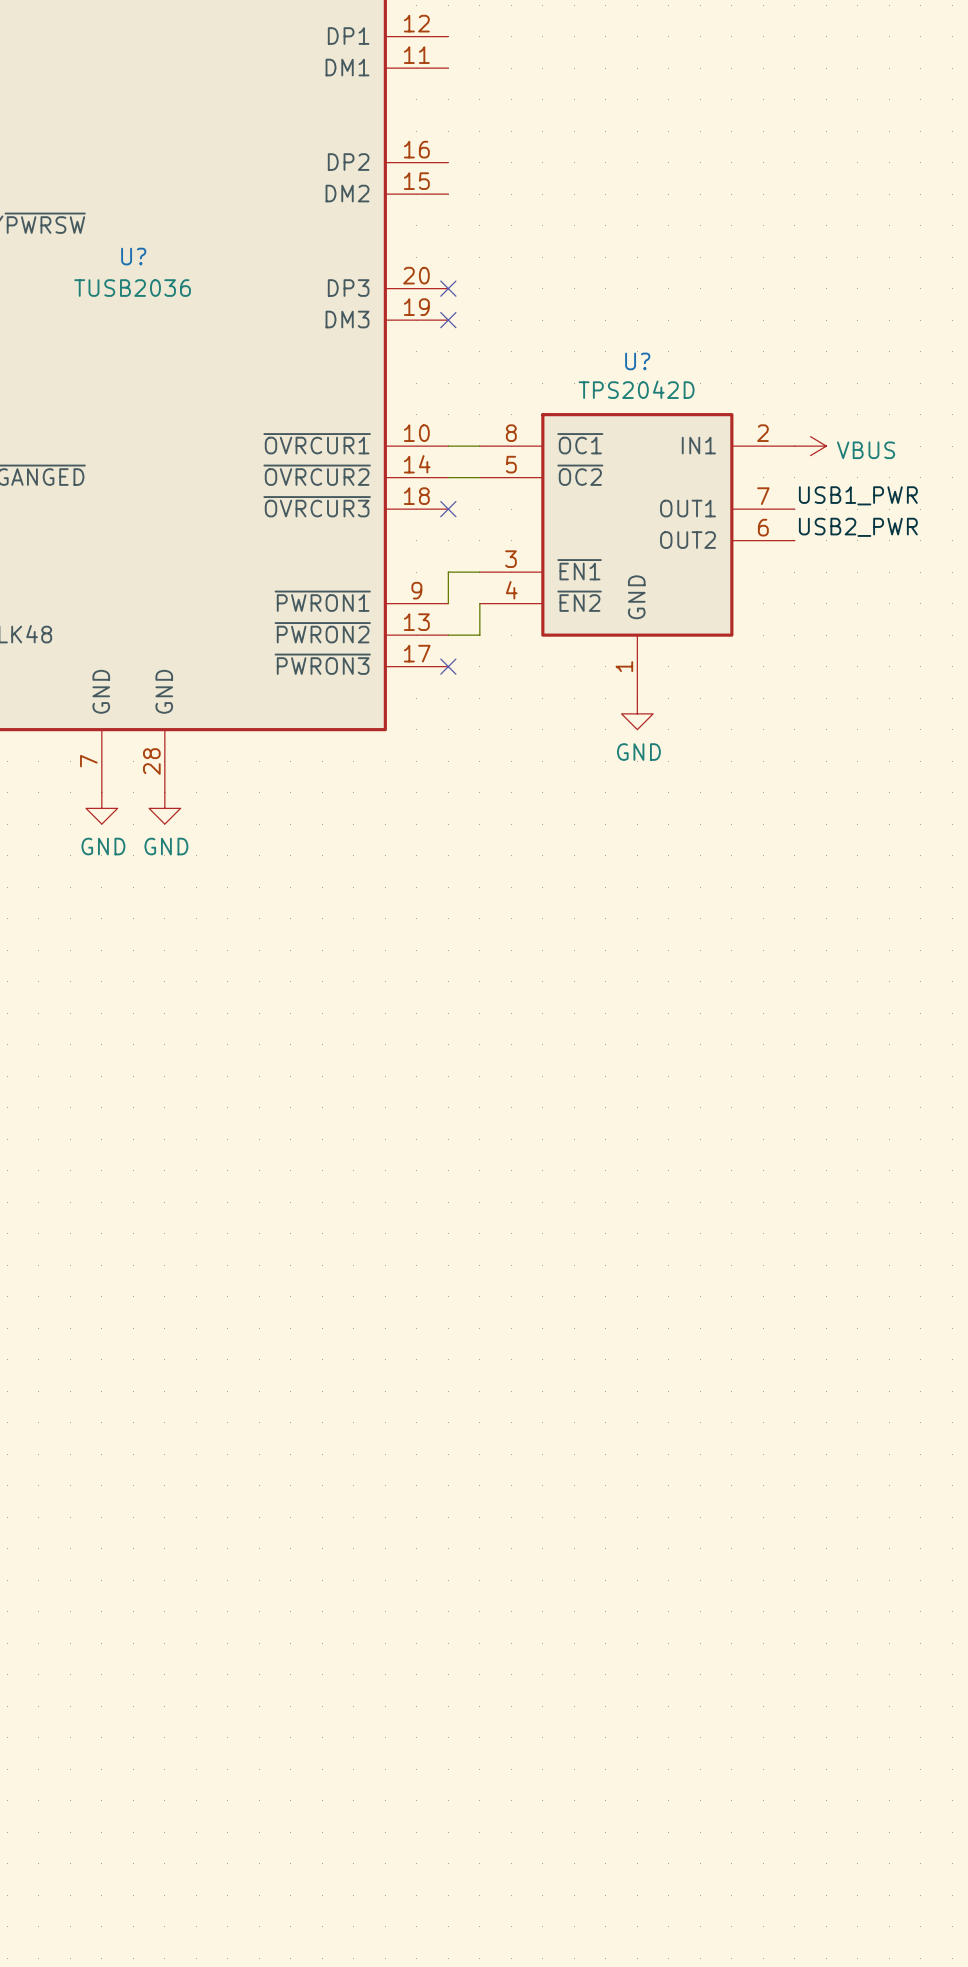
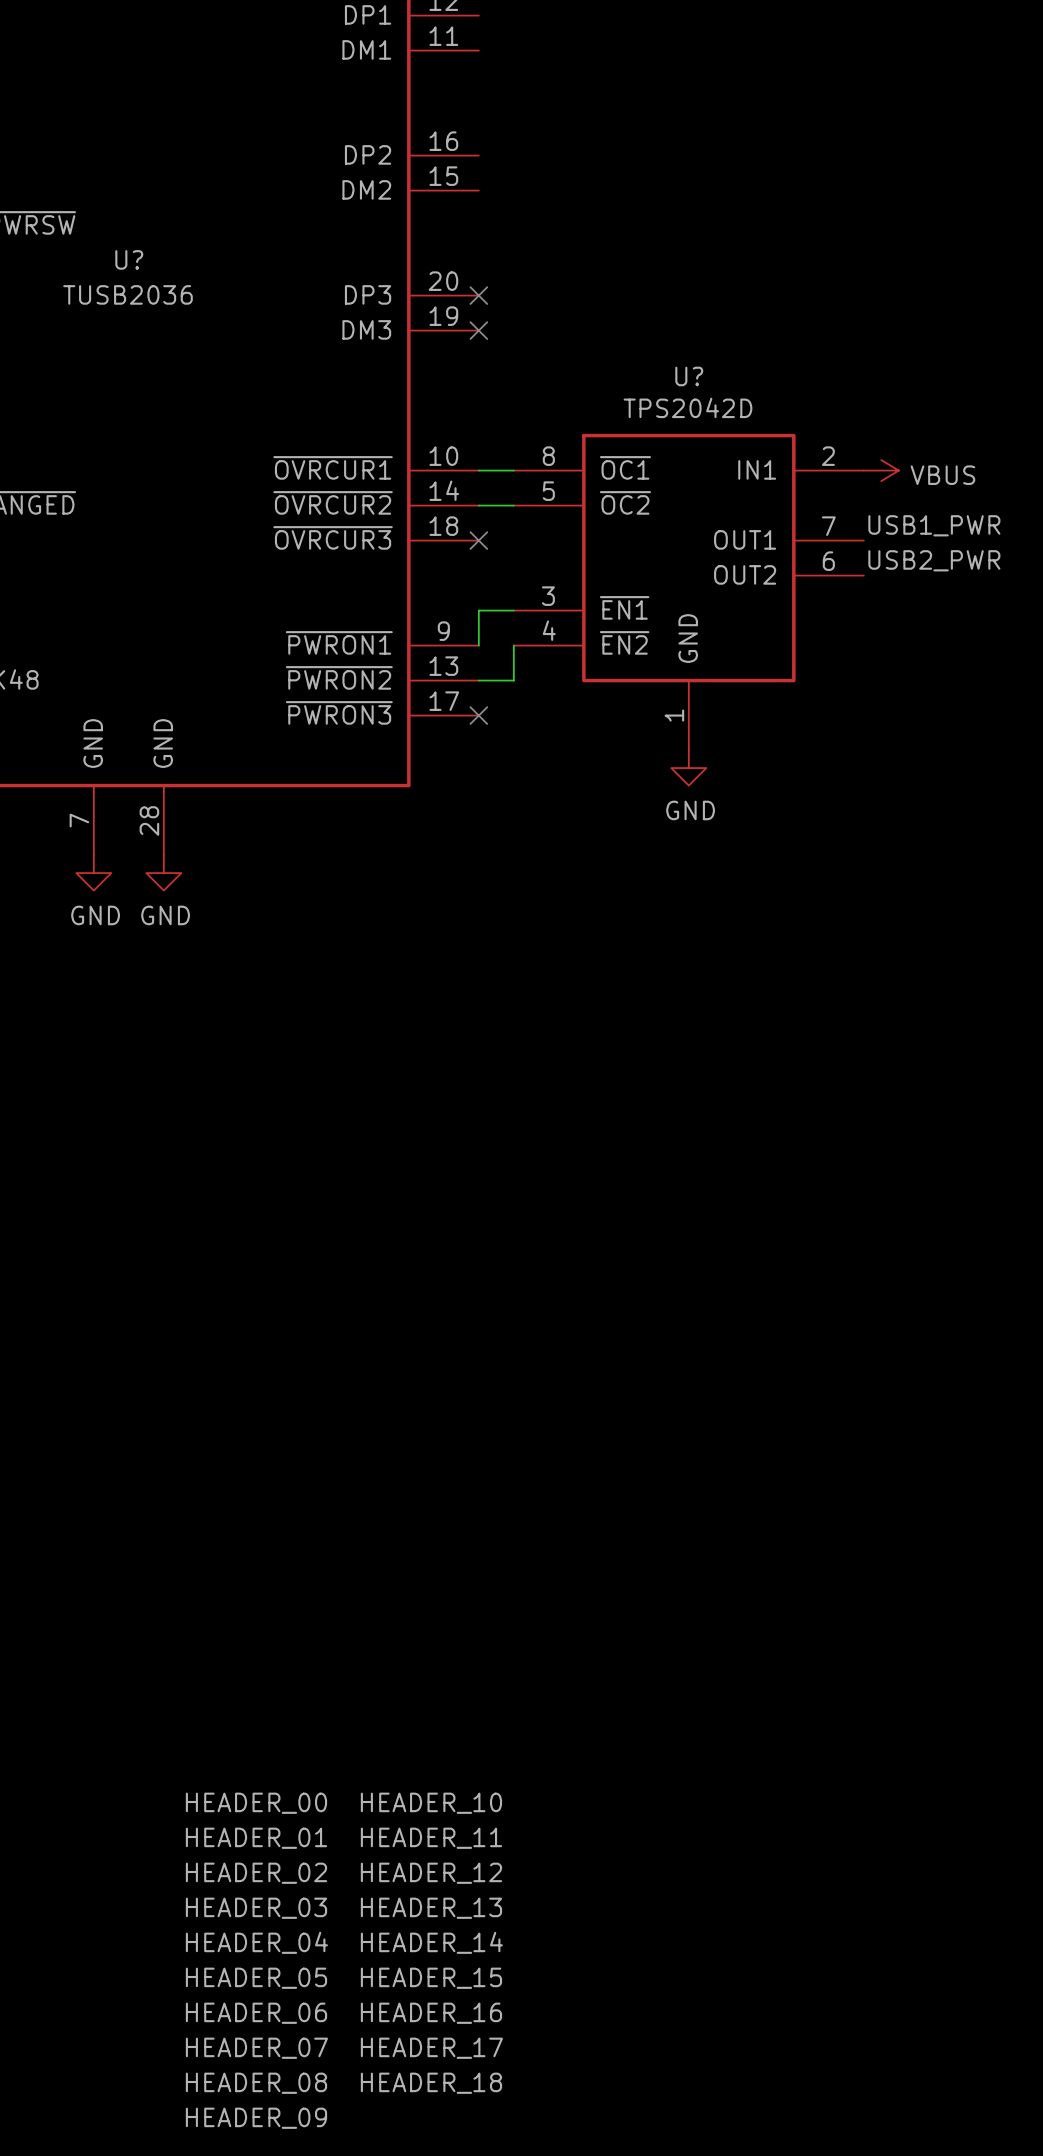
label: none -> HEADER_00 (256, 1803)
label: none -> HEADER_10 (431, 1803)
label: none -> HEADER_01 (256, 1838)
label: none -> HEADER_11 (431, 1838)
label: none -> HEADER_02 (256, 1873)
label: none -> HEADER_12 (431, 1873)
label: none -> HEADER_03 (256, 1908)
label: none -> HEADER_13 (431, 1908)
label: none -> HEADER_04 (256, 1942)
label: none -> HEADER_14 (431, 1942)
label: none -> HEADER_05 (256, 1978)
label: none -> HEADER_15 (431, 1978)
label: none -> HEADER_06 (256, 2013)
label: none -> HEADER_16 (431, 2013)
label: none -> HEADER_07 (256, 2048)
label: none -> HEADER_17 (431, 2048)
label: none -> HEADER_08 (256, 2083)
label: none -> HEADER_18 (431, 2083)
label: none -> HEADER_09 (256, 2118)

